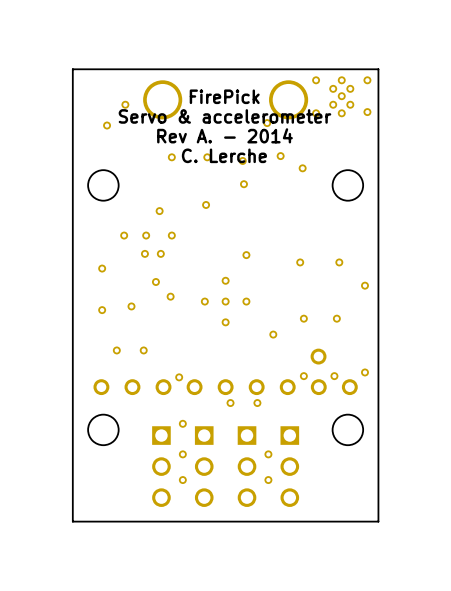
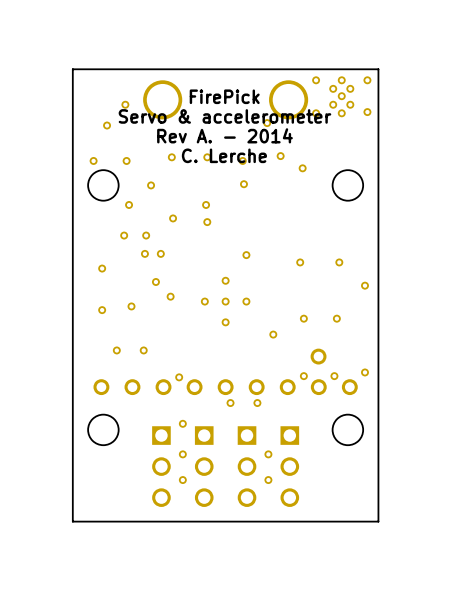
part: none -> (93, 160)
part: none -> (126, 160)
part: none -> (151, 185)
part: none -> (129, 204)
part: (159, 211) -> none
part: none -> (173, 218)
part: none -> (207, 222)
part: (171, 235) -> none

